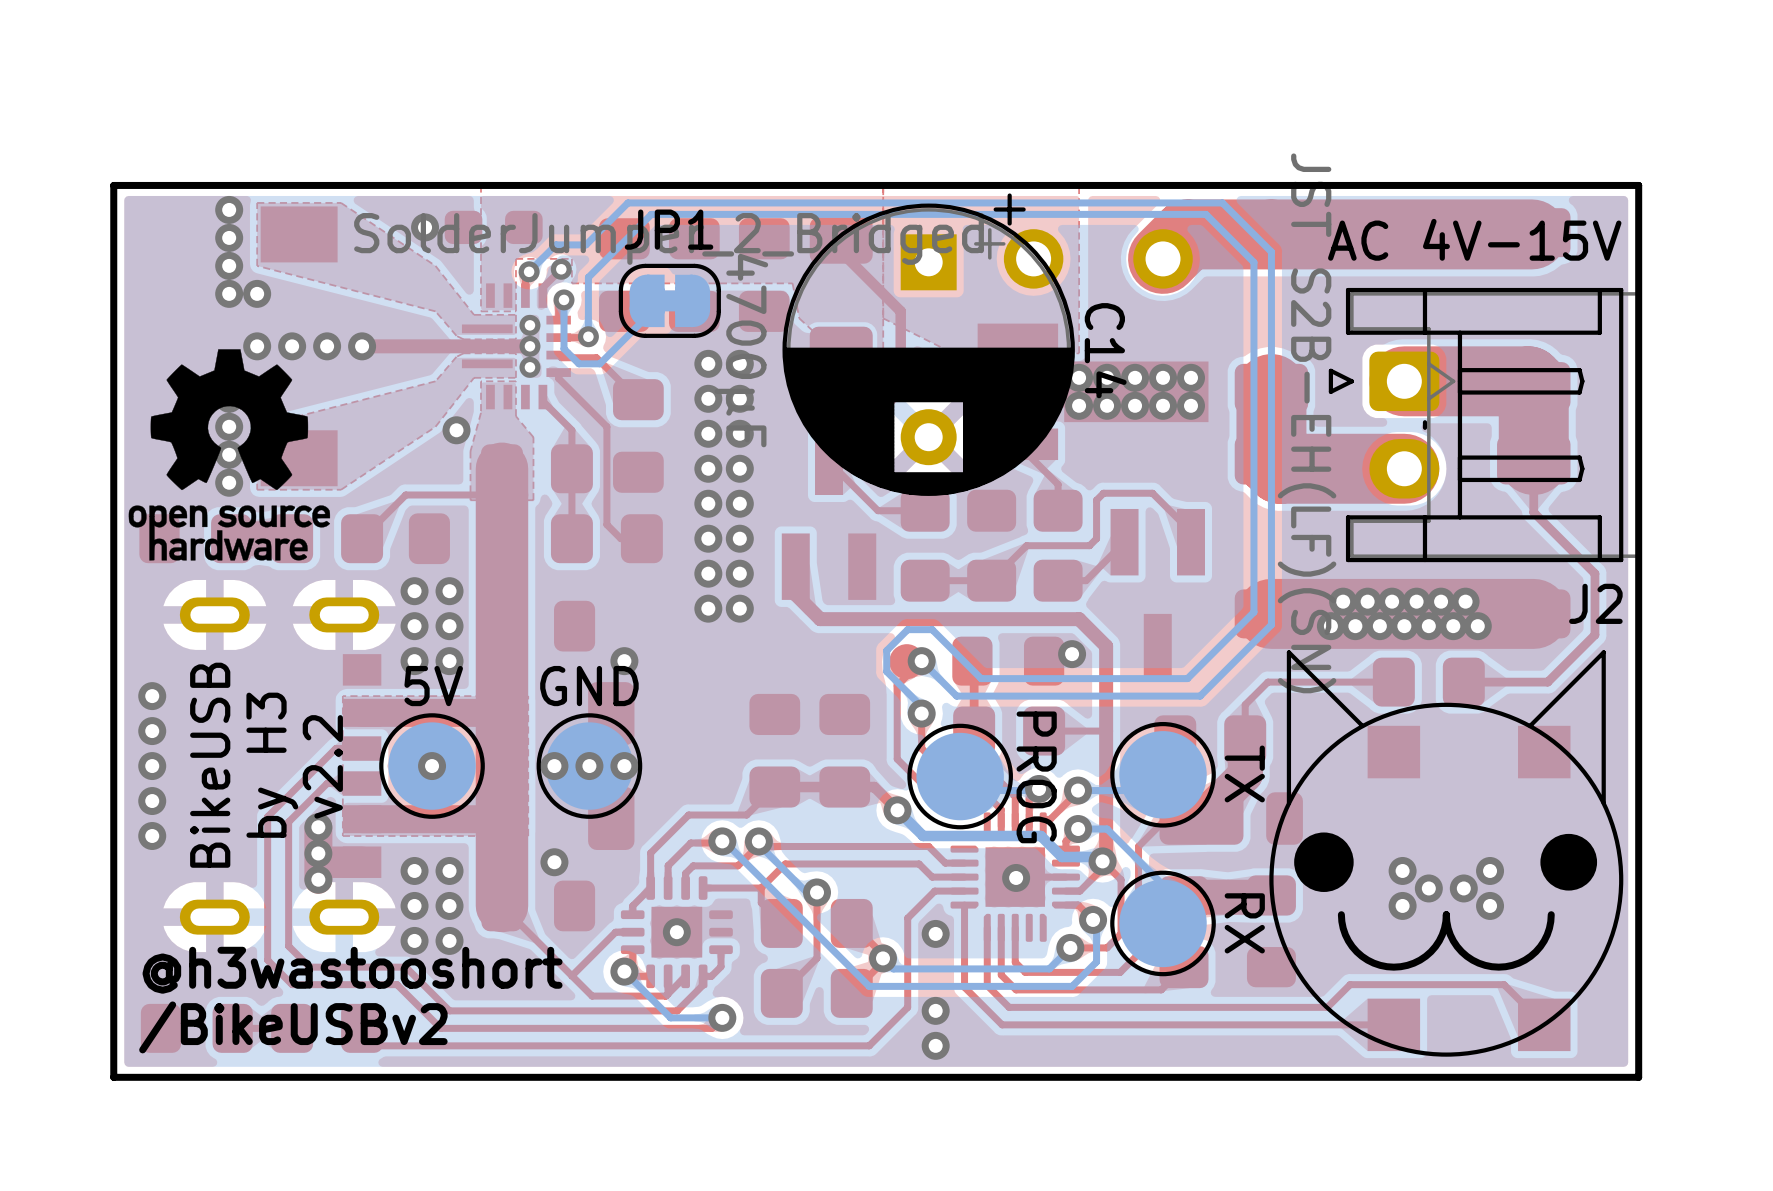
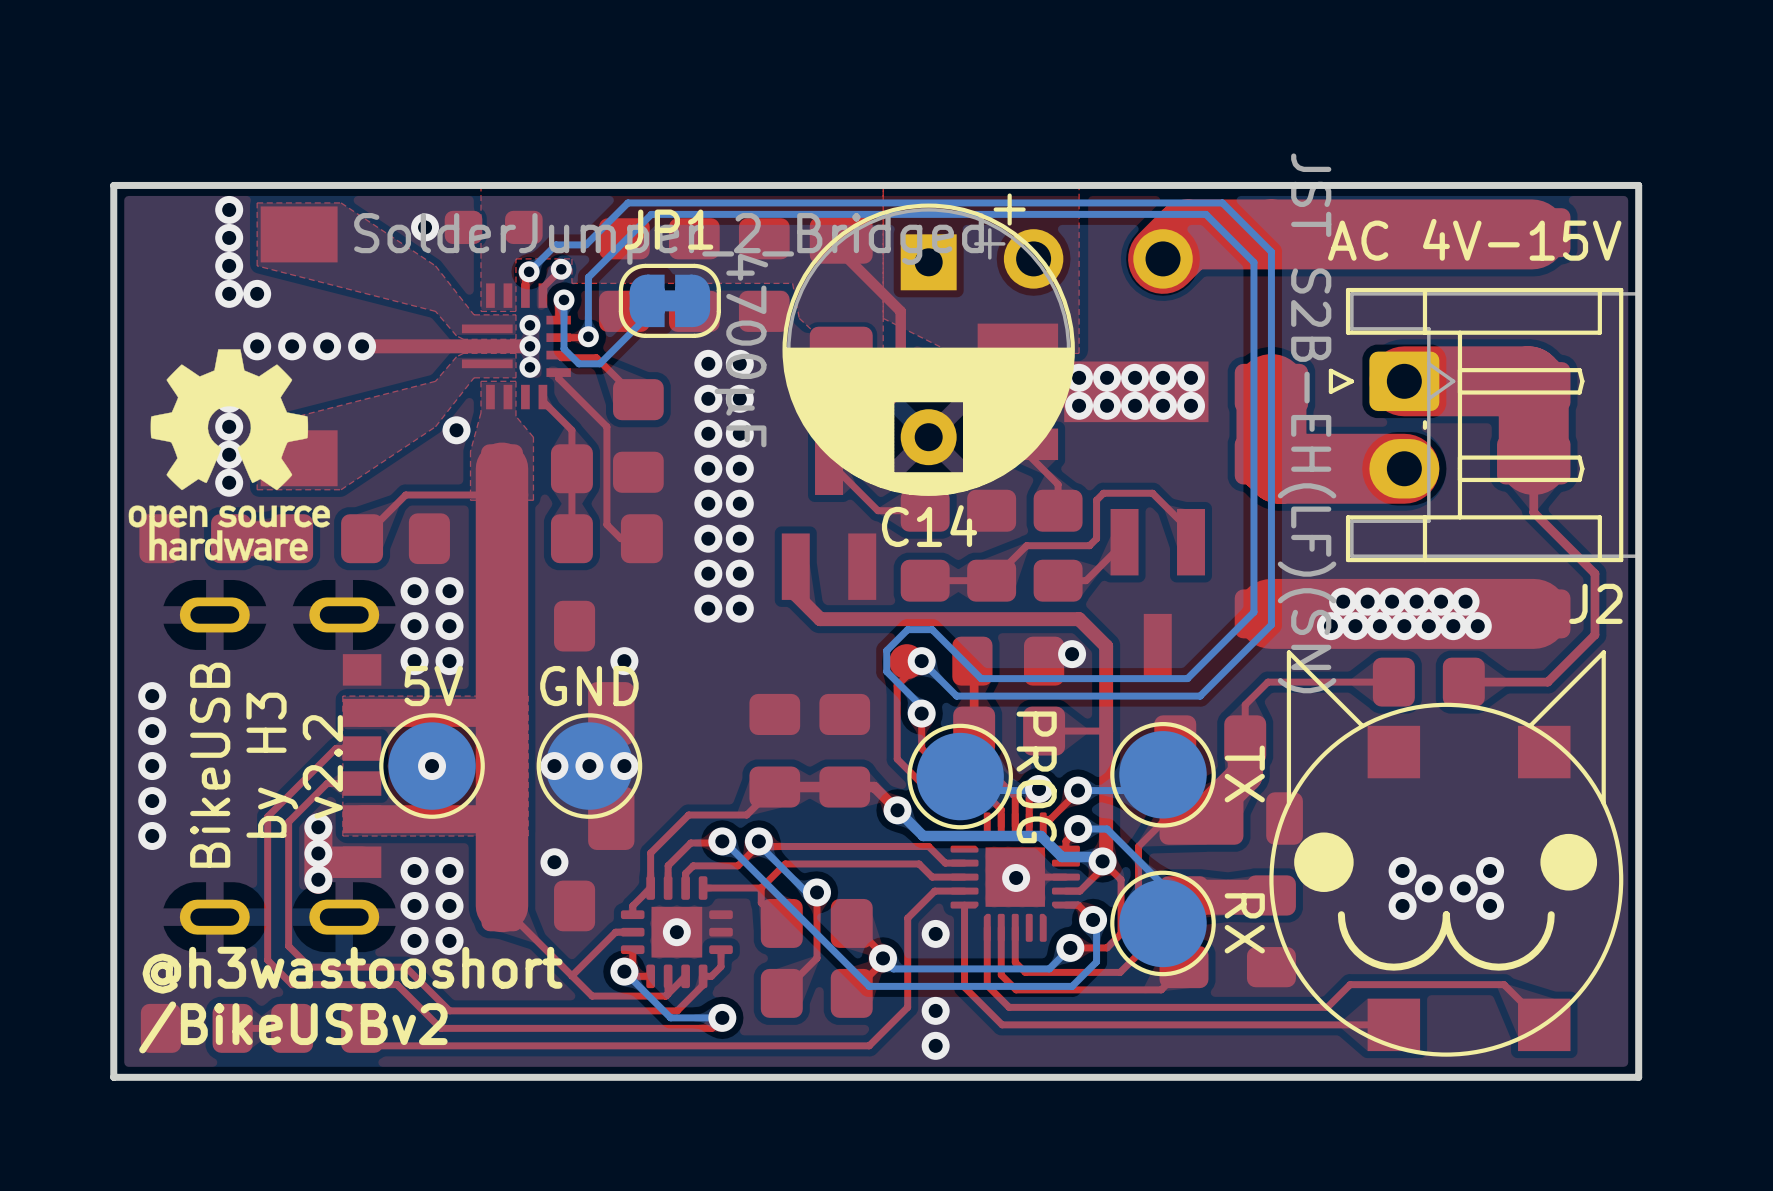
C14 name rotation: 0° (1105, 350) -> 90° counterclockwise (929, 526)
C14 name position: C14 (1105, 350) -> C14 (929, 526)

